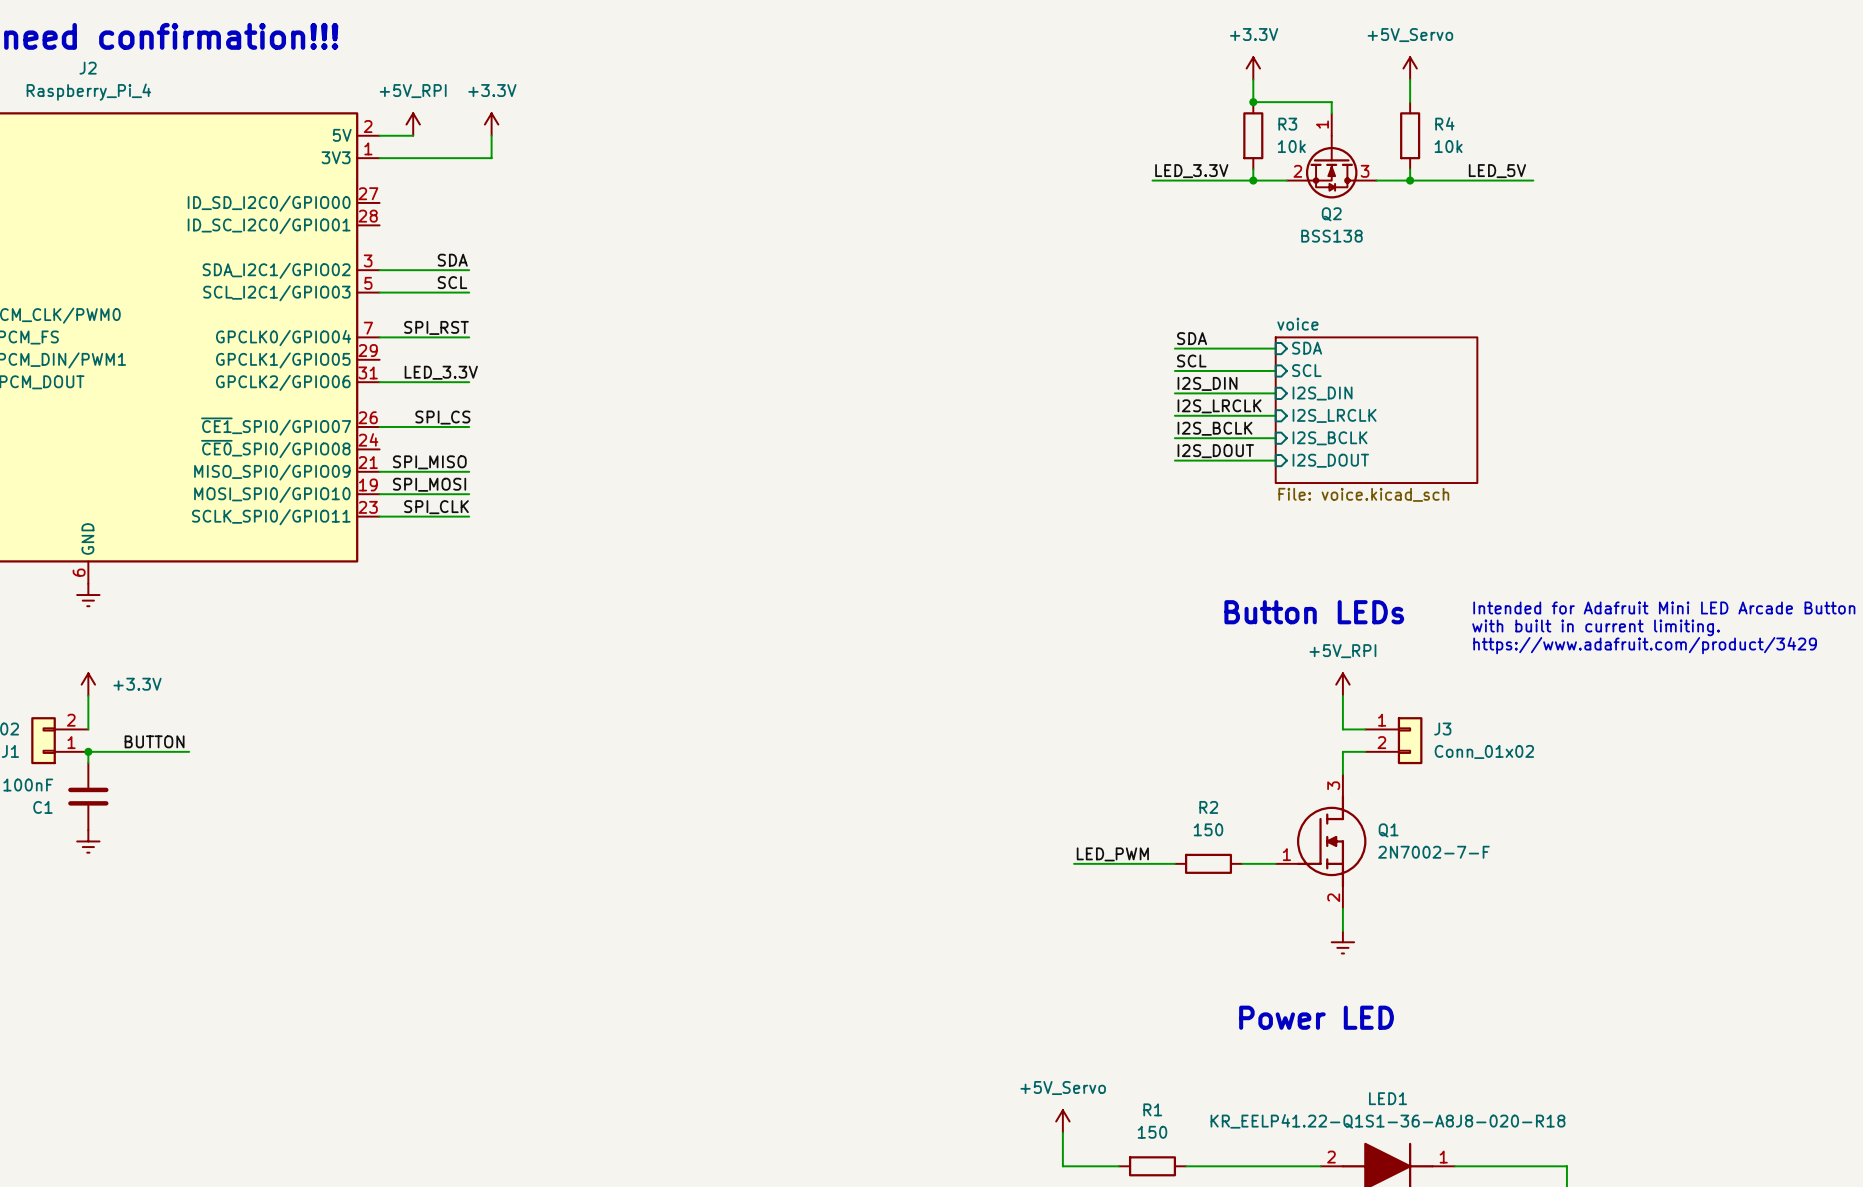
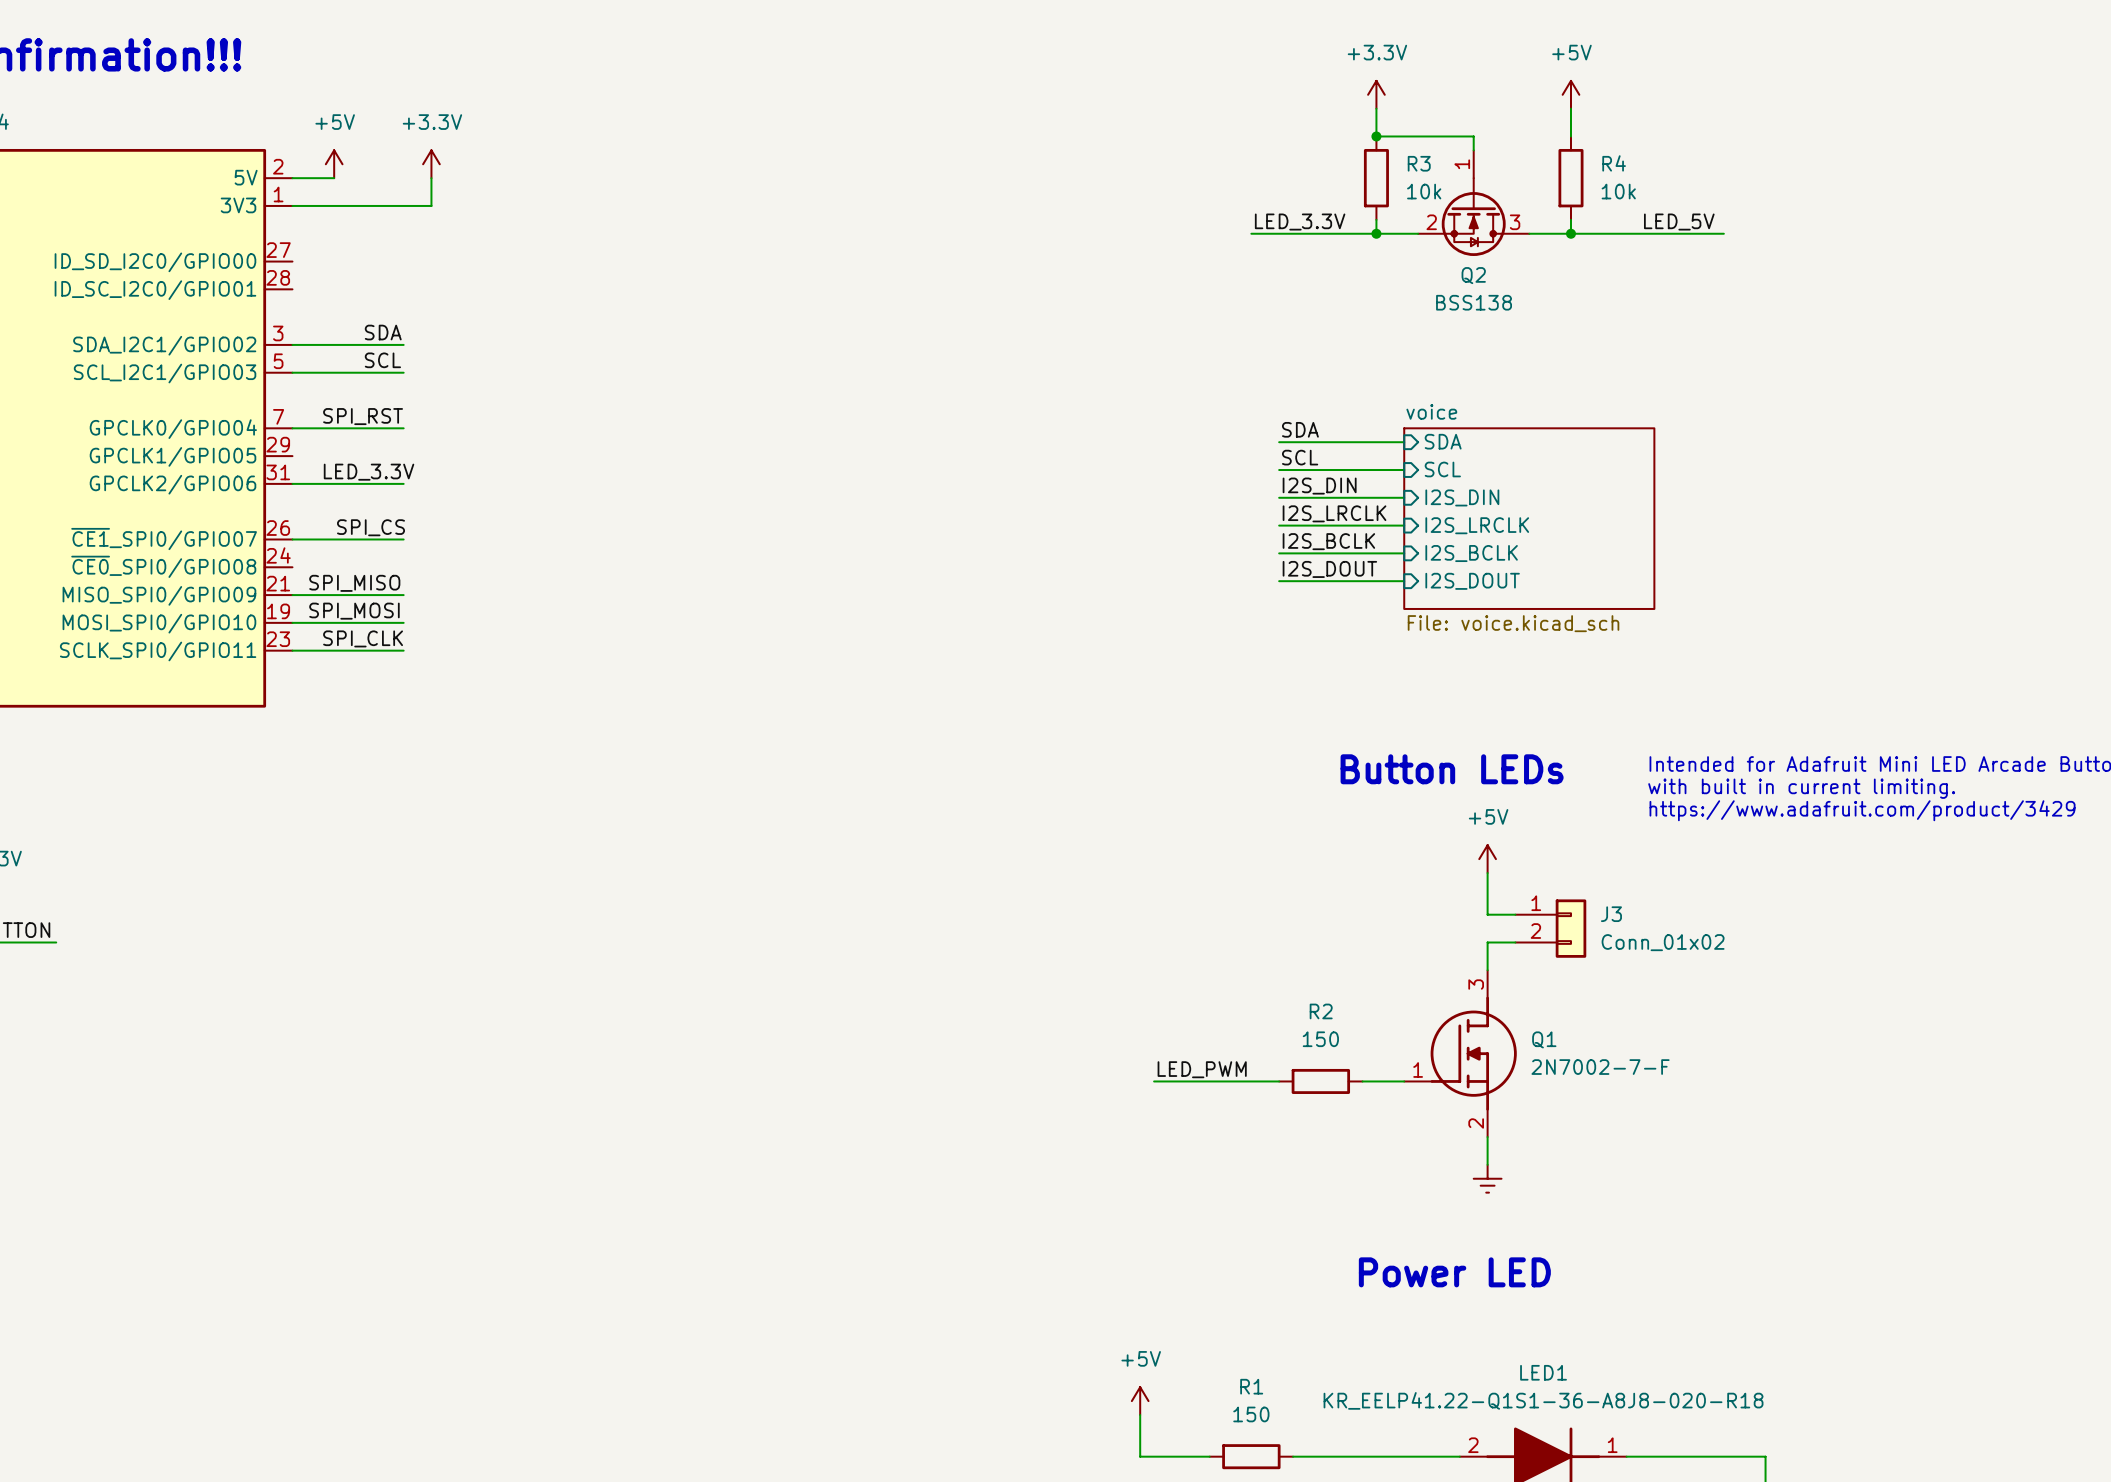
power symbol: +5V_Servo (1410, 68) -> +5V (1570, 94)
power symbol: +5V_RPI (413, 124) -> +5V (334, 164)
power symbol: +5V_RPI (1342, 684) -> +5V (1487, 859)
power symbol: +5V_Servo (1062, 1121) -> +5V (1140, 1401)

